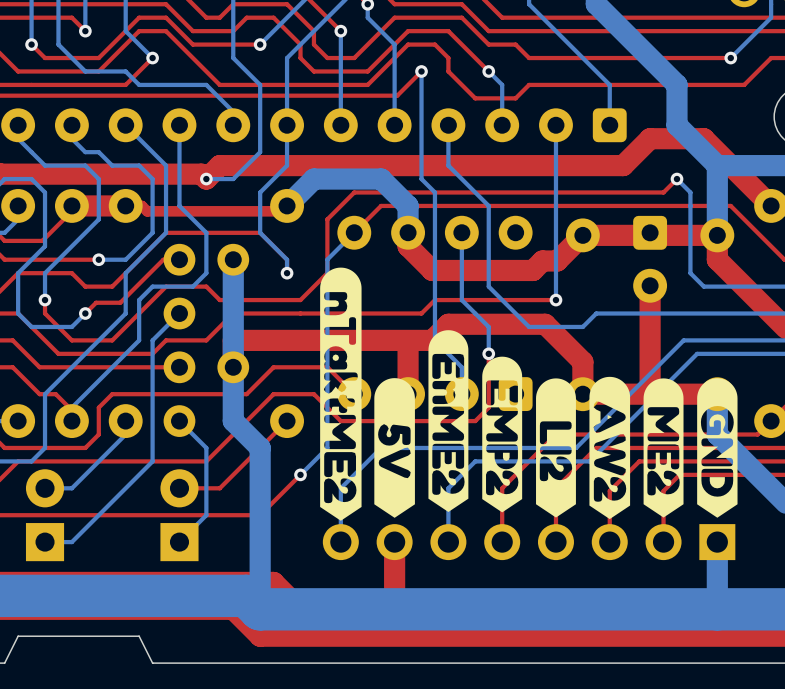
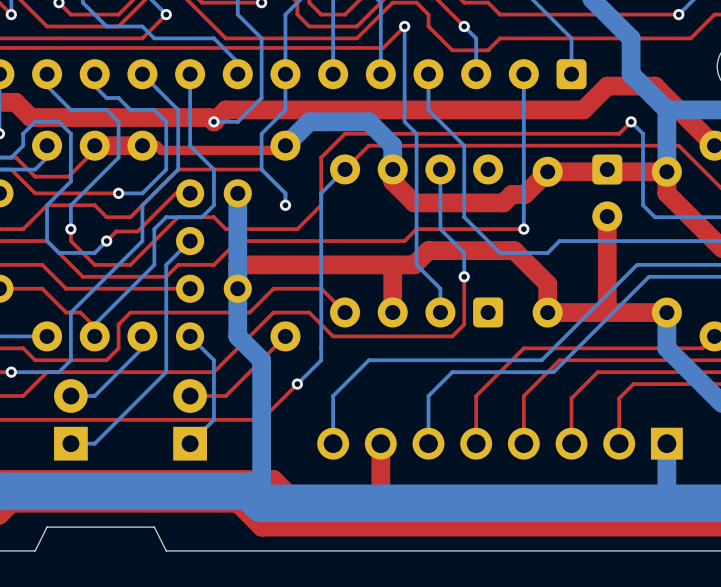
drawing: [320, 267, 738, 521] -> none

